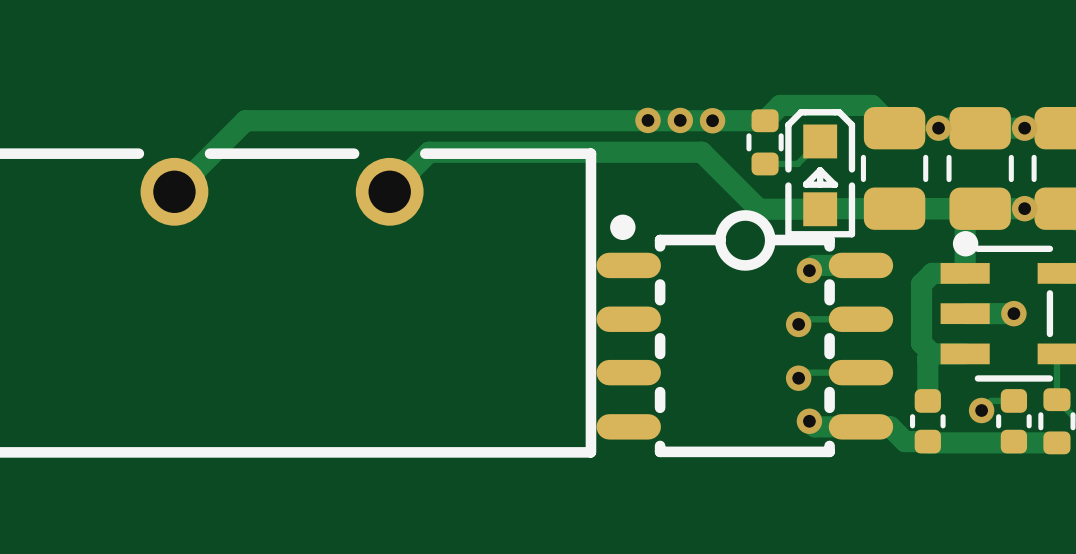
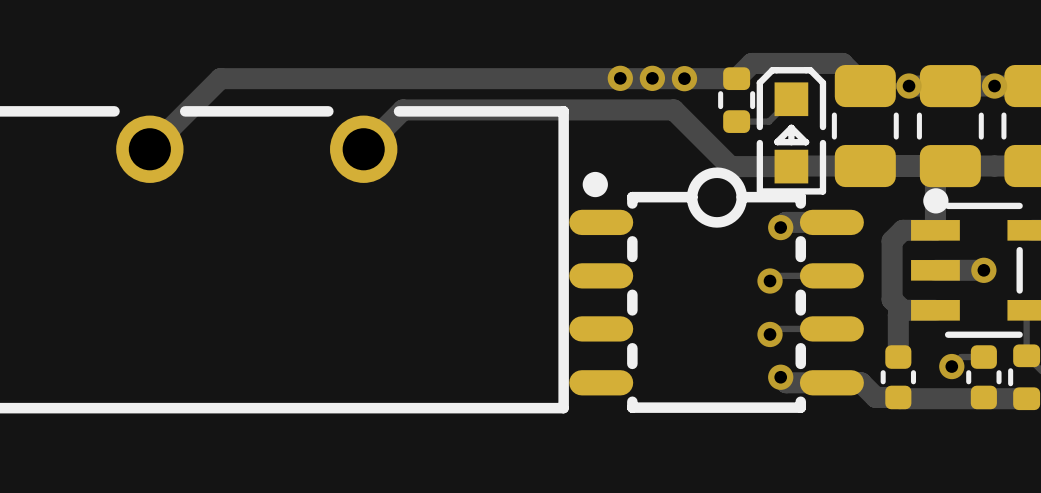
via: (1024, 208) -> none

